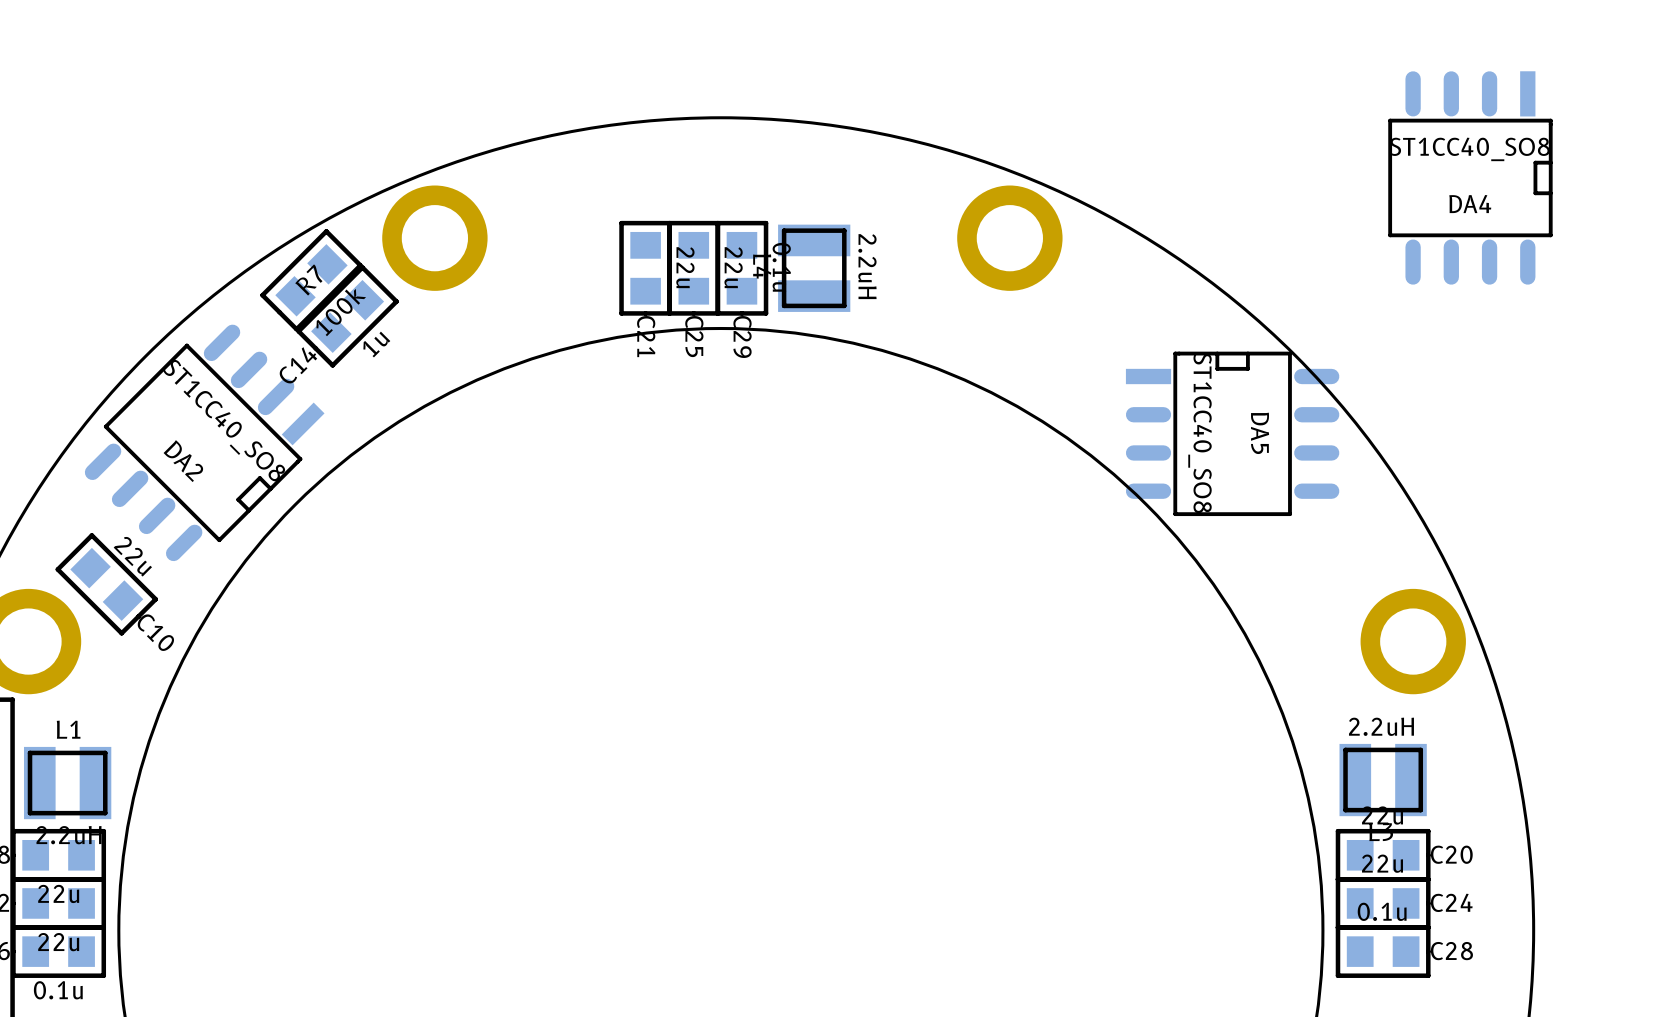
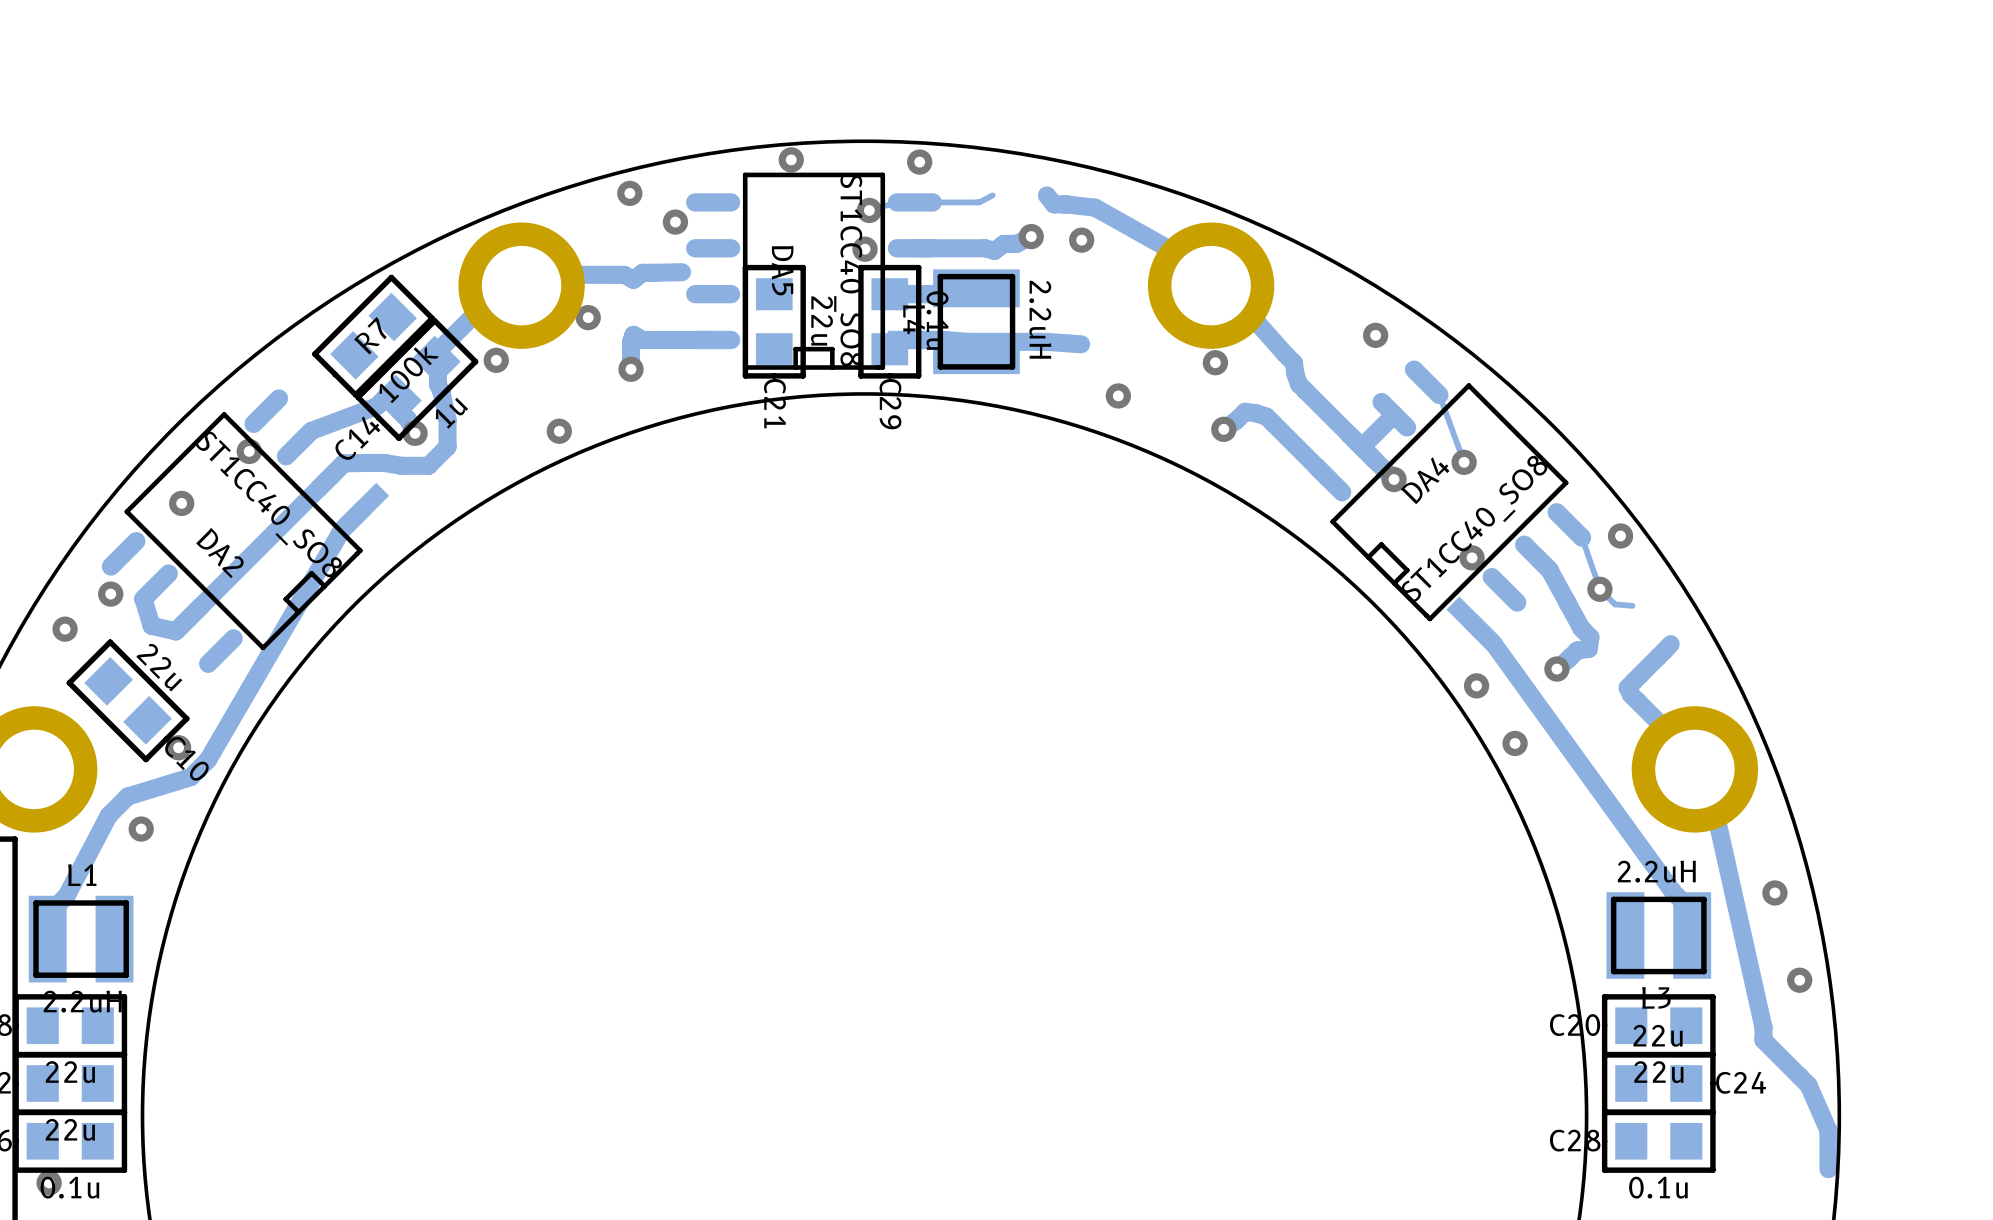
via: none -> (791, 159)
via: none -> (919, 162)
via: none -> (629, 193)
track: none -> (992, 195) (979, 202) (896, 202) (869, 210)
track: none -> (1046, 195) (1054, 204) (1095, 207) (1214, 274) (1293, 362) (1298, 384) (1394, 479)
via: none -> (869, 210)
DA4 rotation: 0° (1470, 177) -> 135° clockwise (1449, 504)
DA4 position: (1470, 177) -> (1449, 504)
via: none -> (675, 222)
track: none -> (1031, 236) (1016, 243) (1003, 243) (994, 250) (985, 248) (914, 248)
via: none -> (1031, 236)
via: none -> (1081, 240)
via: none -> (865, 249)
track: none -> (681, 272) (642, 272) (633, 279) (624, 274) (514, 274) (437, 351) (437, 384) (447, 419) (447, 446) (428, 465) (401, 465) (384, 462) (343, 463) (175, 631) (151, 625) (143, 598) (156, 586)
via: none -> (588, 317)
C25: 22u (693, 268) -> none
via: none -> (1375, 335)
track: none -> (713, 339) (642, 339) (633, 334) (631, 341) (631, 369)
track: none -> (914, 339) (1046, 341) (1081, 344)
via: none -> (496, 360)
via: none -> (1215, 362)
via: none -> (631, 369)
track: none -> (1426, 382) (1439, 394) (1464, 462)
via: none -> (1118, 395)
track: none -> (1394, 414) (1361, 447)
track: none -> (1223, 429) (1245, 411) (1266, 416) (1329, 479)
via: none -> (1223, 429)
via: none -> (559, 431)
track: none -> (415, 433) (408, 419) (399, 410) (397, 398) (385, 397) (376, 406) (311, 430) (298, 443)
via: none -> (415, 433)
via: none -> (249, 451)
via: none -> (1464, 462)
via: none -> (1394, 479)
via: none -> (181, 503)
track: none -> (363, 508) (341, 530) (208, 759) (190, 777) (127, 796) (108, 815) (66, 895) (57, 904) (47, 939)
DA5 rotation: 0° (1232, 433) -> 180° (814, 271)
DA5 position: (1232, 433) -> (814, 271)
track: none -> (1569, 524) (1582, 537) (1599, 589) (1615, 604) (1632, 605)
via: none -> (1620, 535)
track: none -> (1536, 557) (1549, 570) (1581, 628) (1590, 637) (1588, 648) (1577, 650) (1556, 669)
via: none -> (1472, 557)
via: none -> (1599, 589)
via: none -> (110, 594)
track: none -> (1472, 622) (1493, 644) (1673, 892) (1682, 901) (1692, 935)
via: none -> (65, 629)
track: none -> (1670, 644) (1627, 687) (1630, 694) (1705, 769) (1763, 1027) (1763, 1040) (1808, 1085) (1828, 1130)
via: none -> (1556, 669)
via: none -> (1476, 685)
via: none -> (1515, 743)
via: none -> (178, 747)
via: none -> (141, 829)
via: none -> (1774, 892)
via: none -> (1799, 980)
C20 rotation: 0° (1383, 855) -> 180° (1658, 1025)
track: none -> (1828, 1130) (1828, 1169)
C28 rotation: 0° (1383, 951) -> 180° (1658, 1141)
via: none -> (49, 1182)

